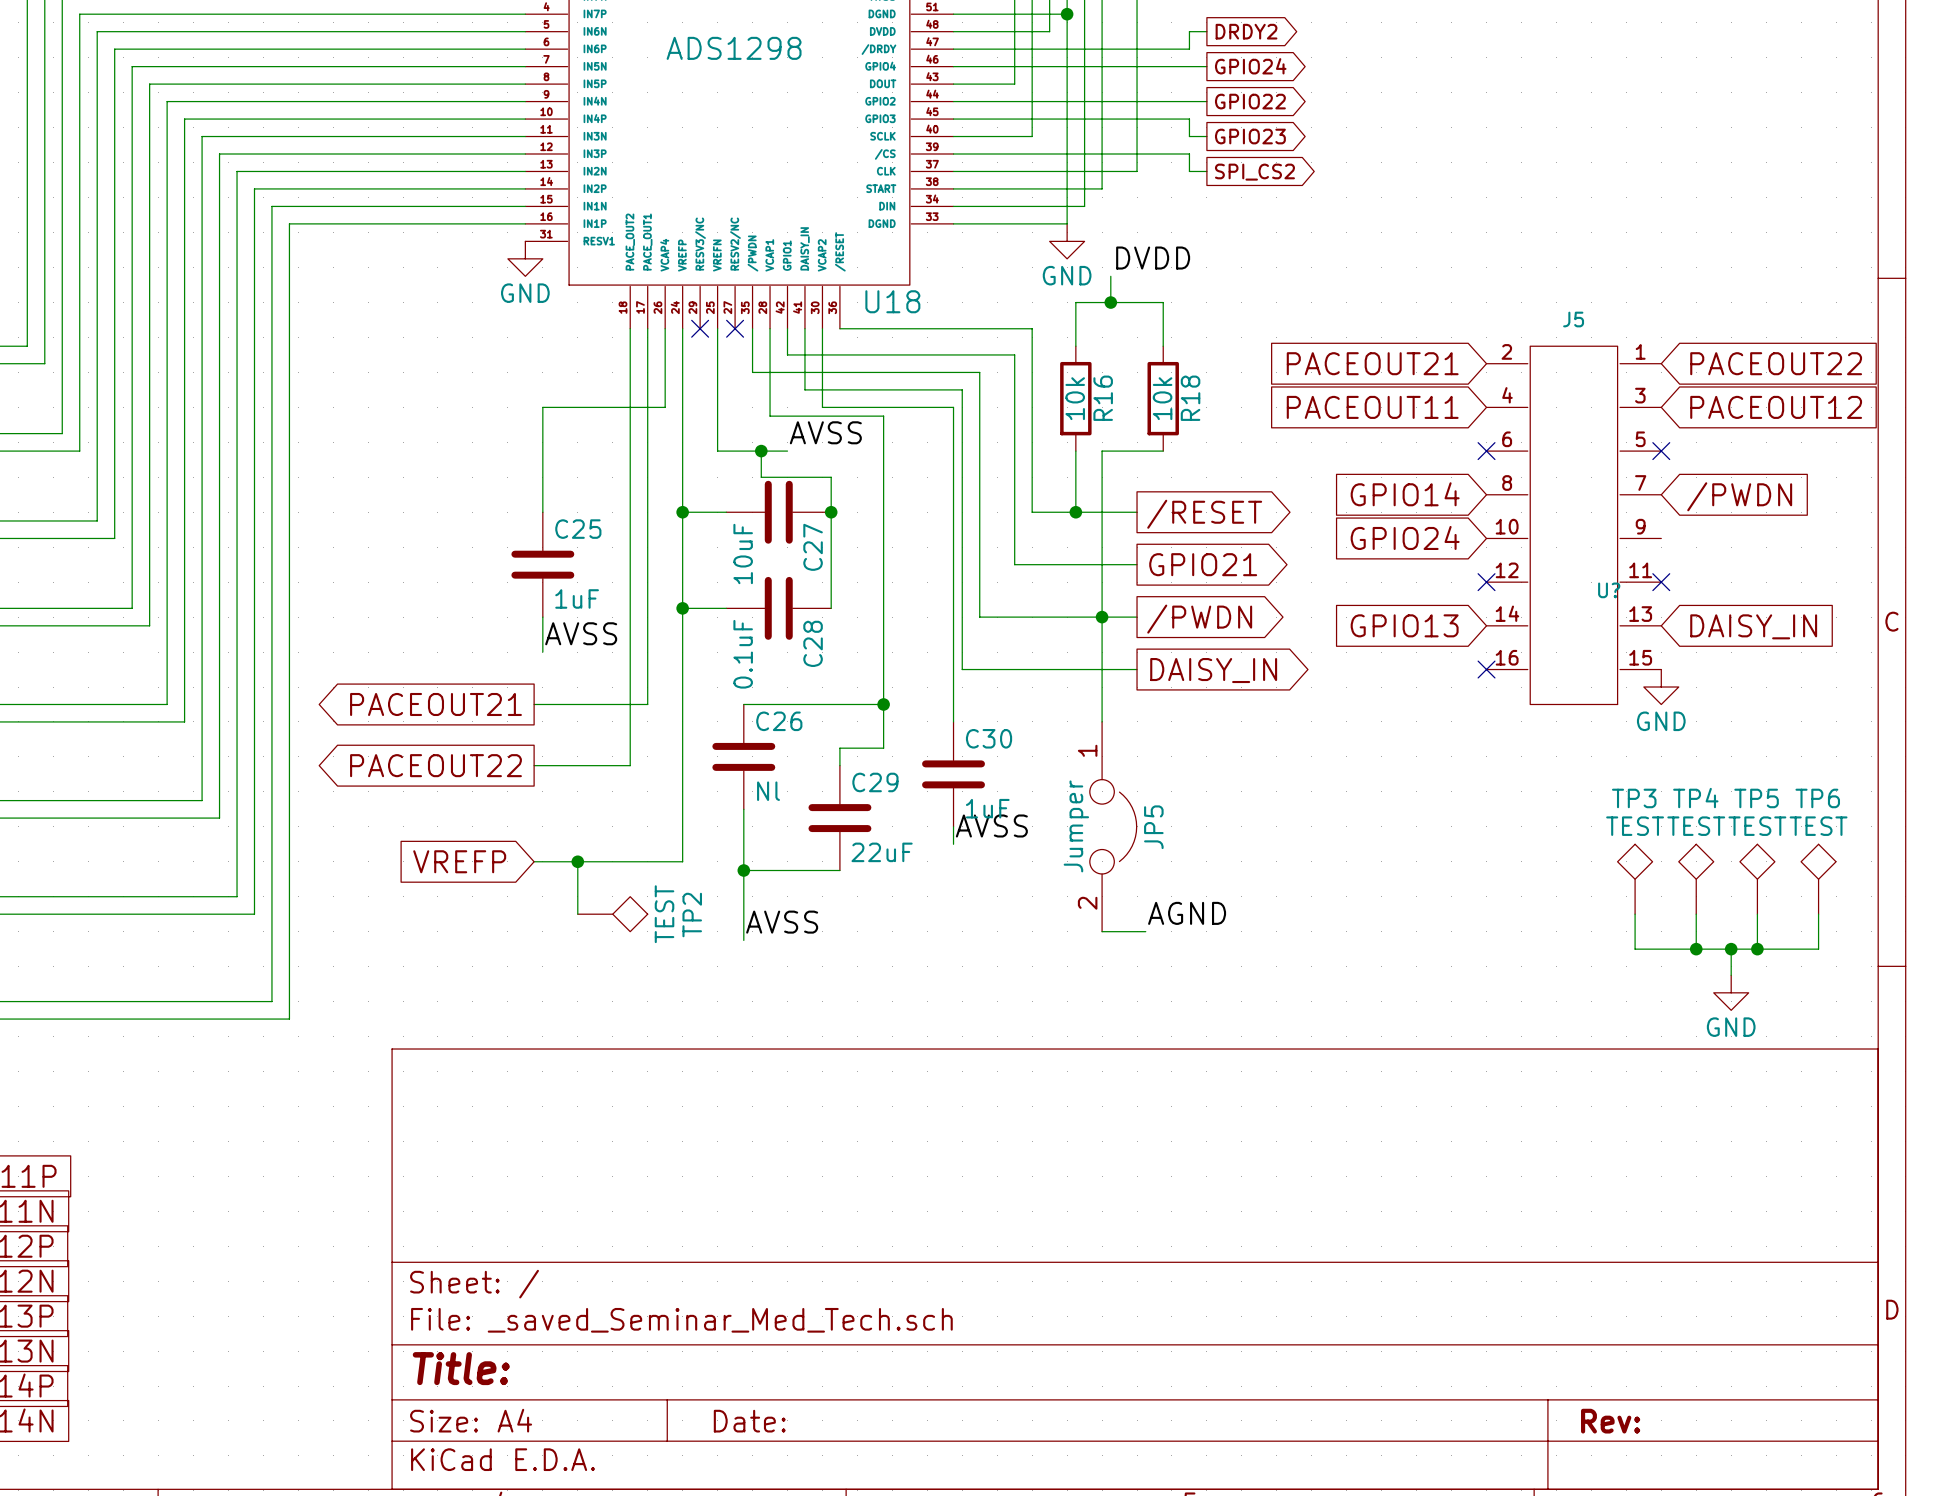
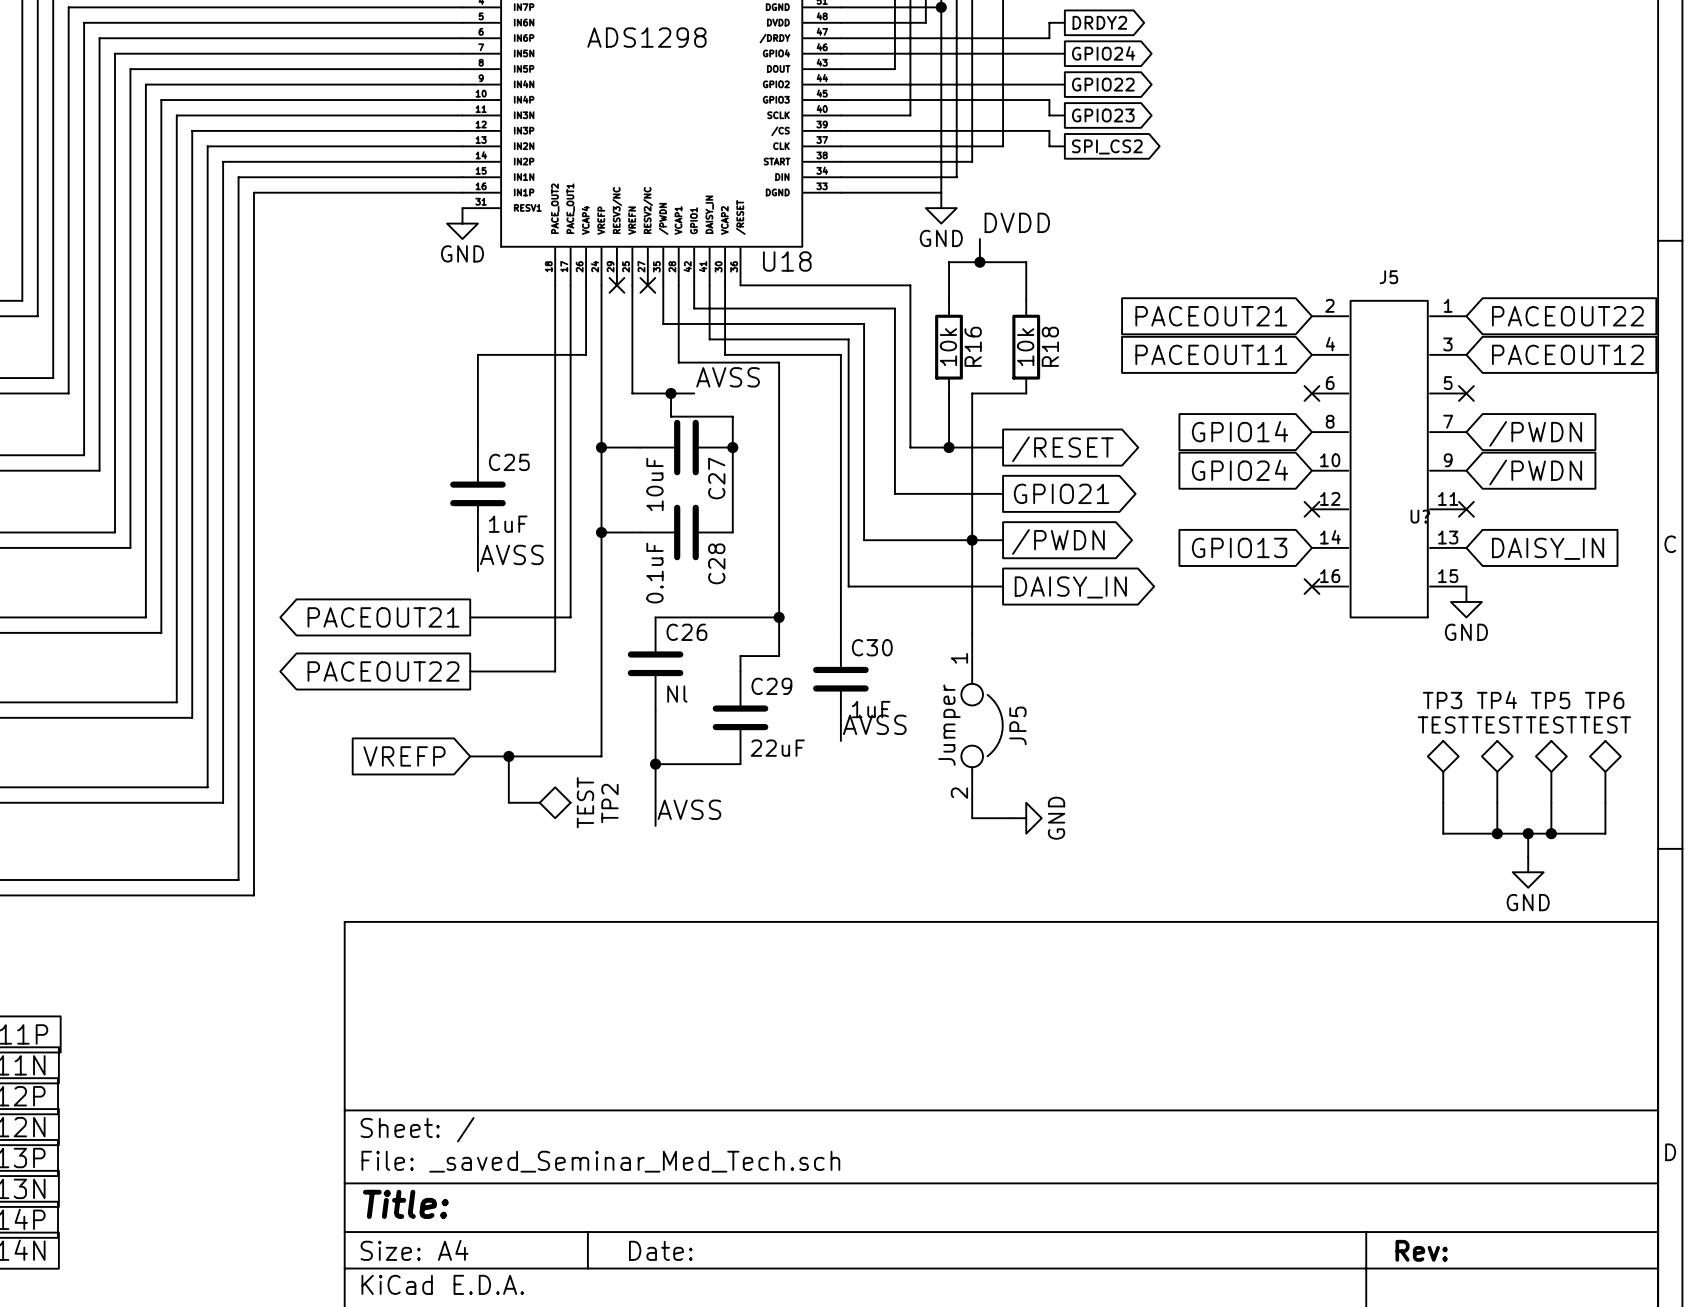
global label: none -> /PWDN (1535, 472)
label: AGND (1187, 913) -> none
power symbol: none -> GND (1026, 818)

